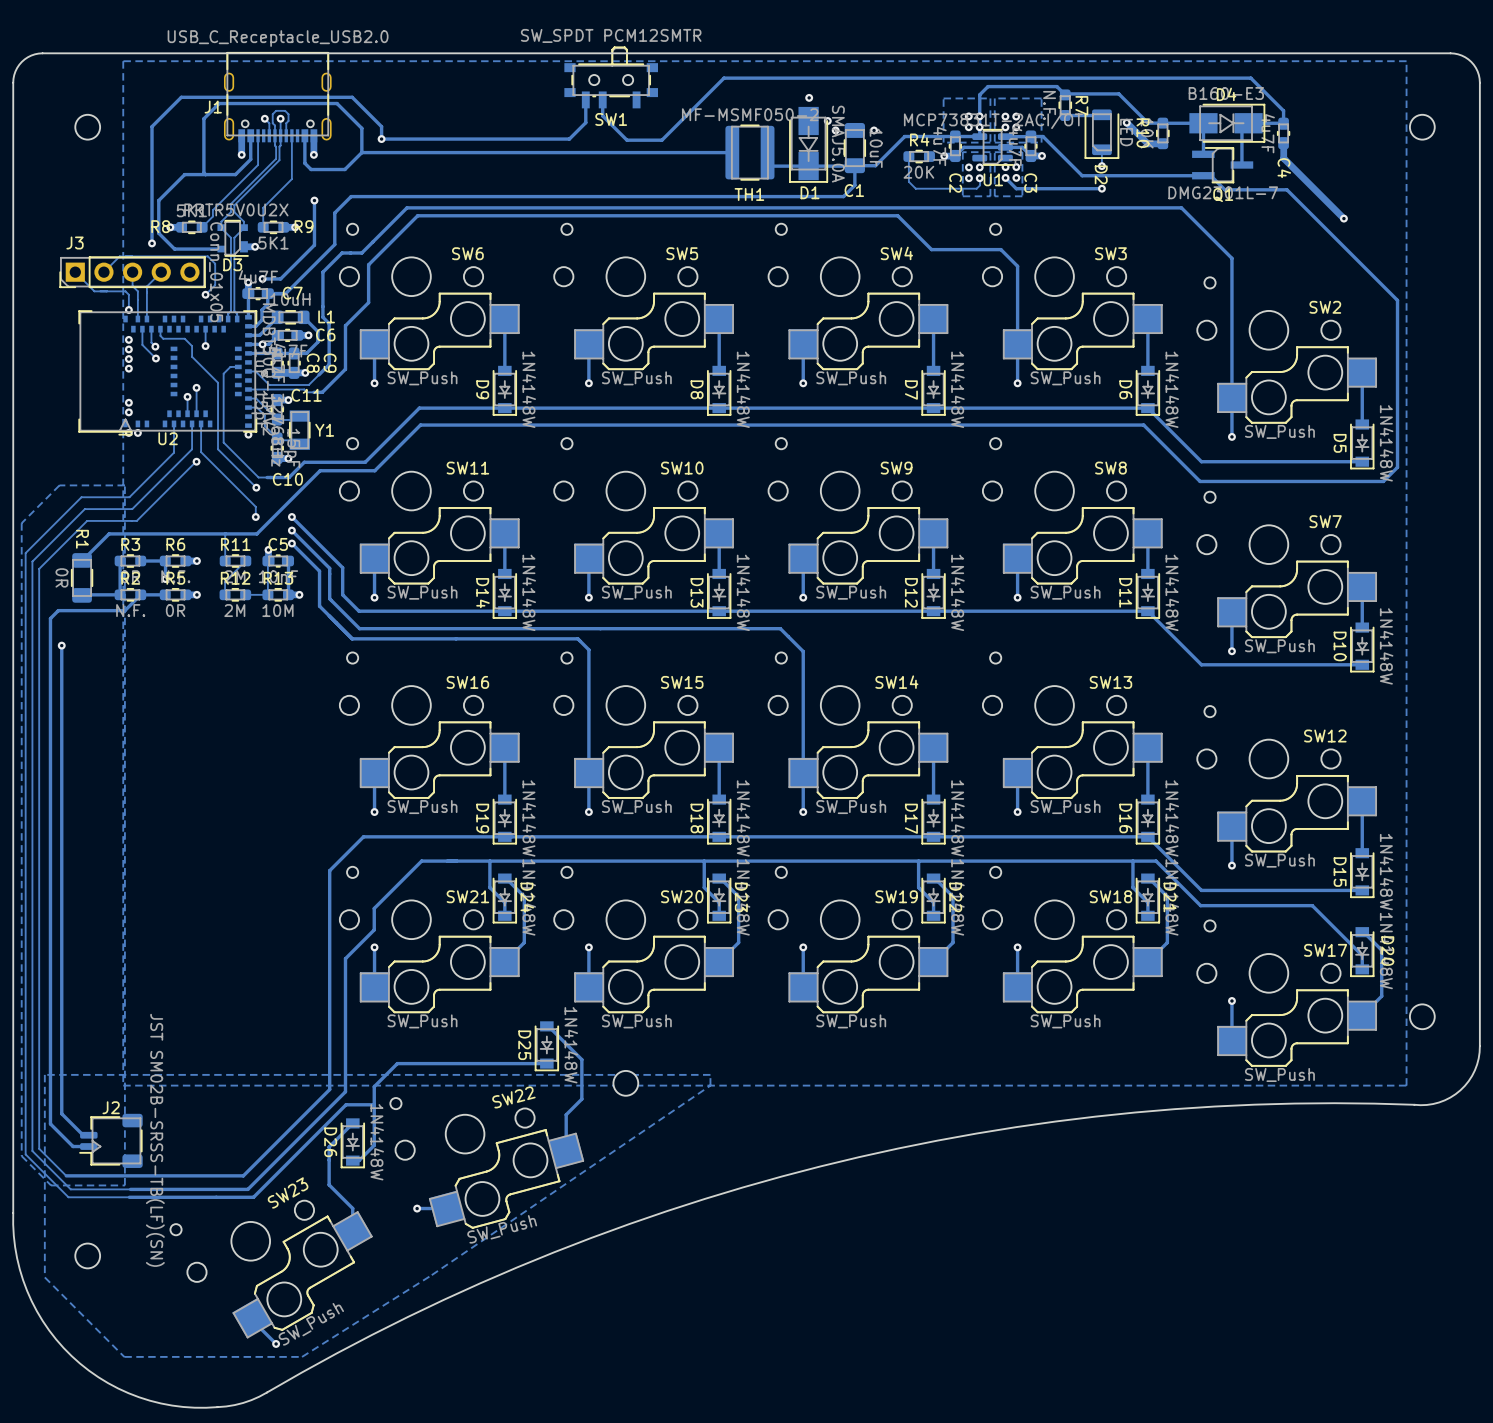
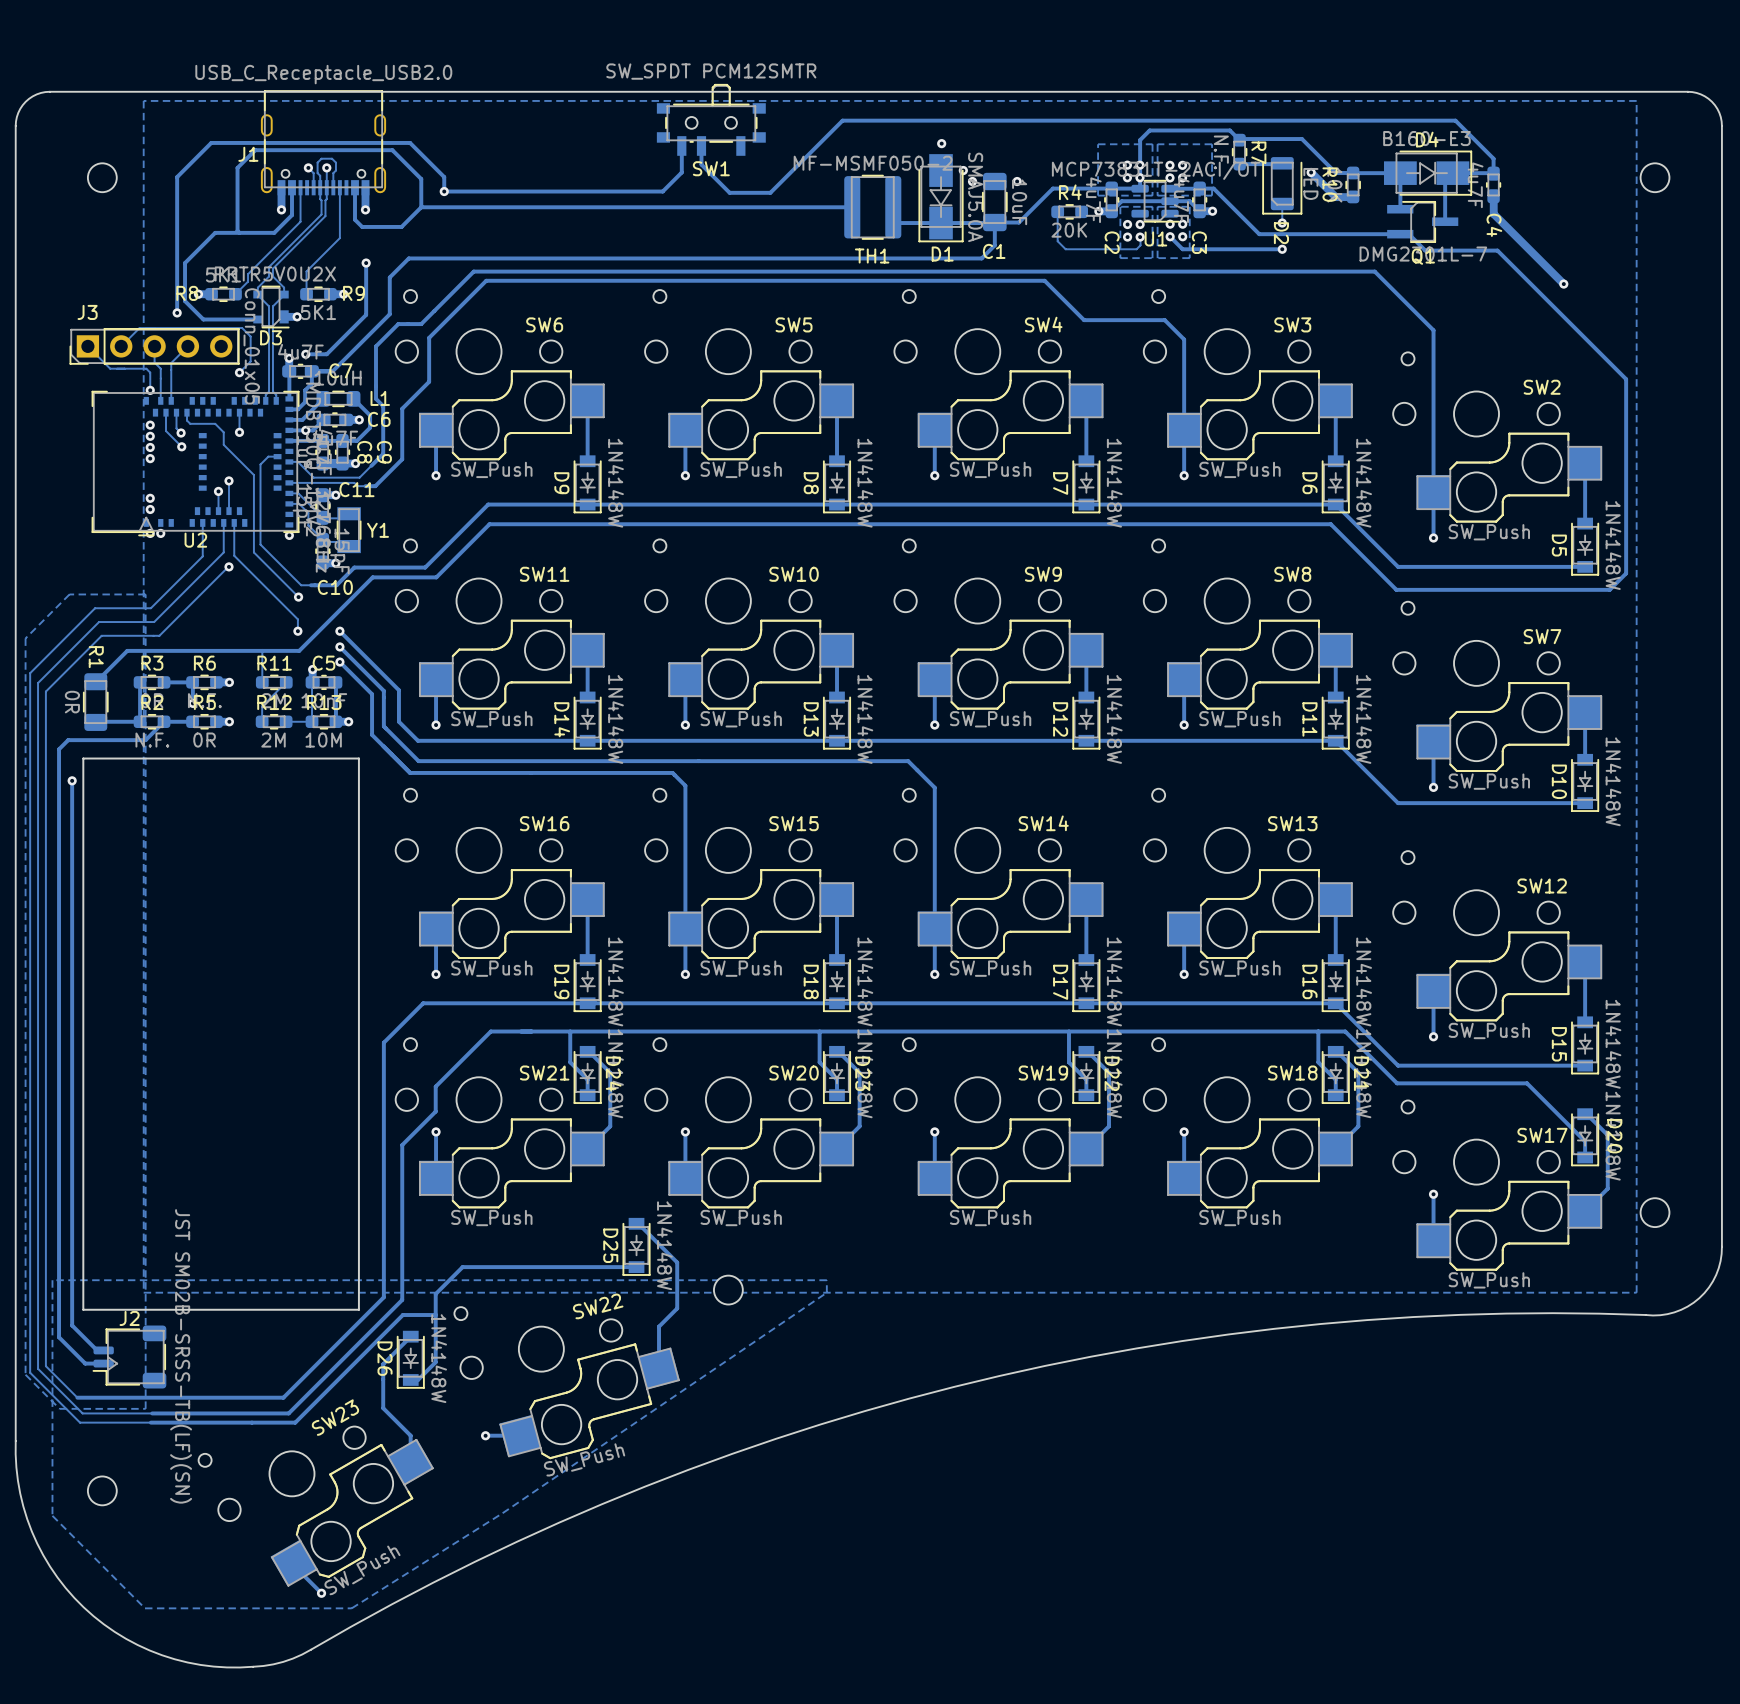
board edge: none -> (358, 758) (358, 1309) (83, 1309) (83, 758) (358, 758)

